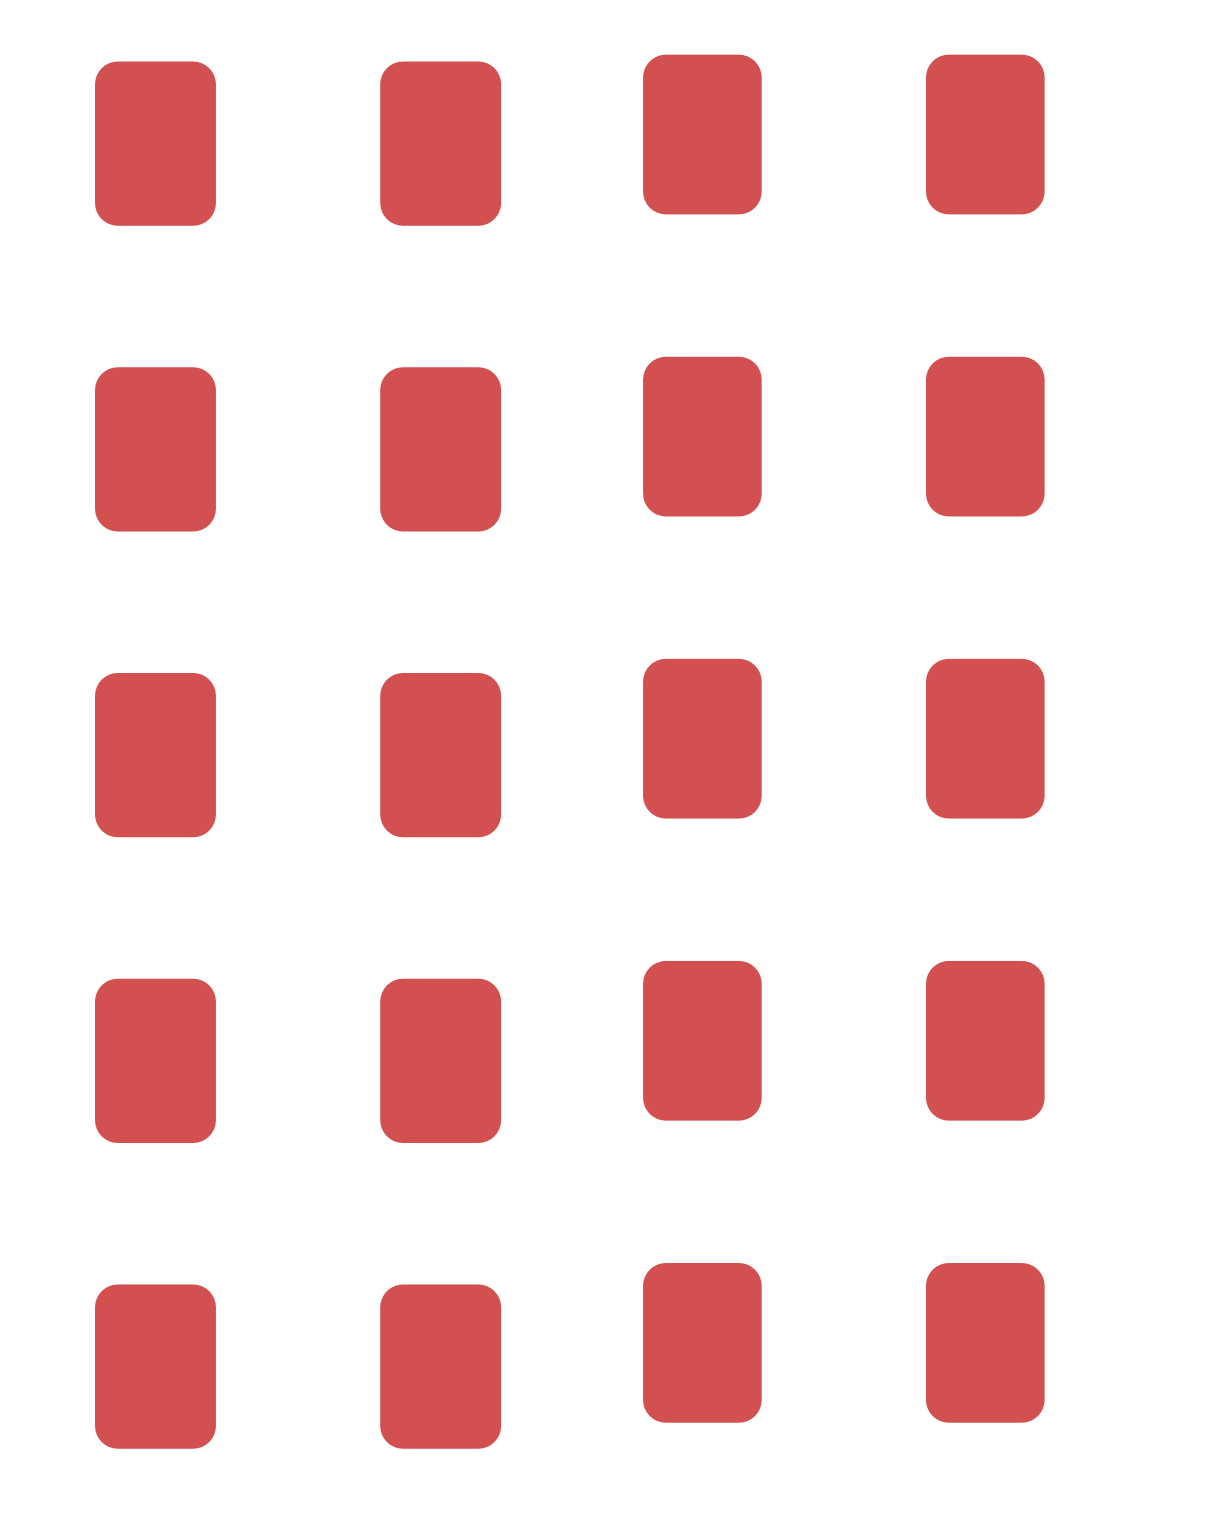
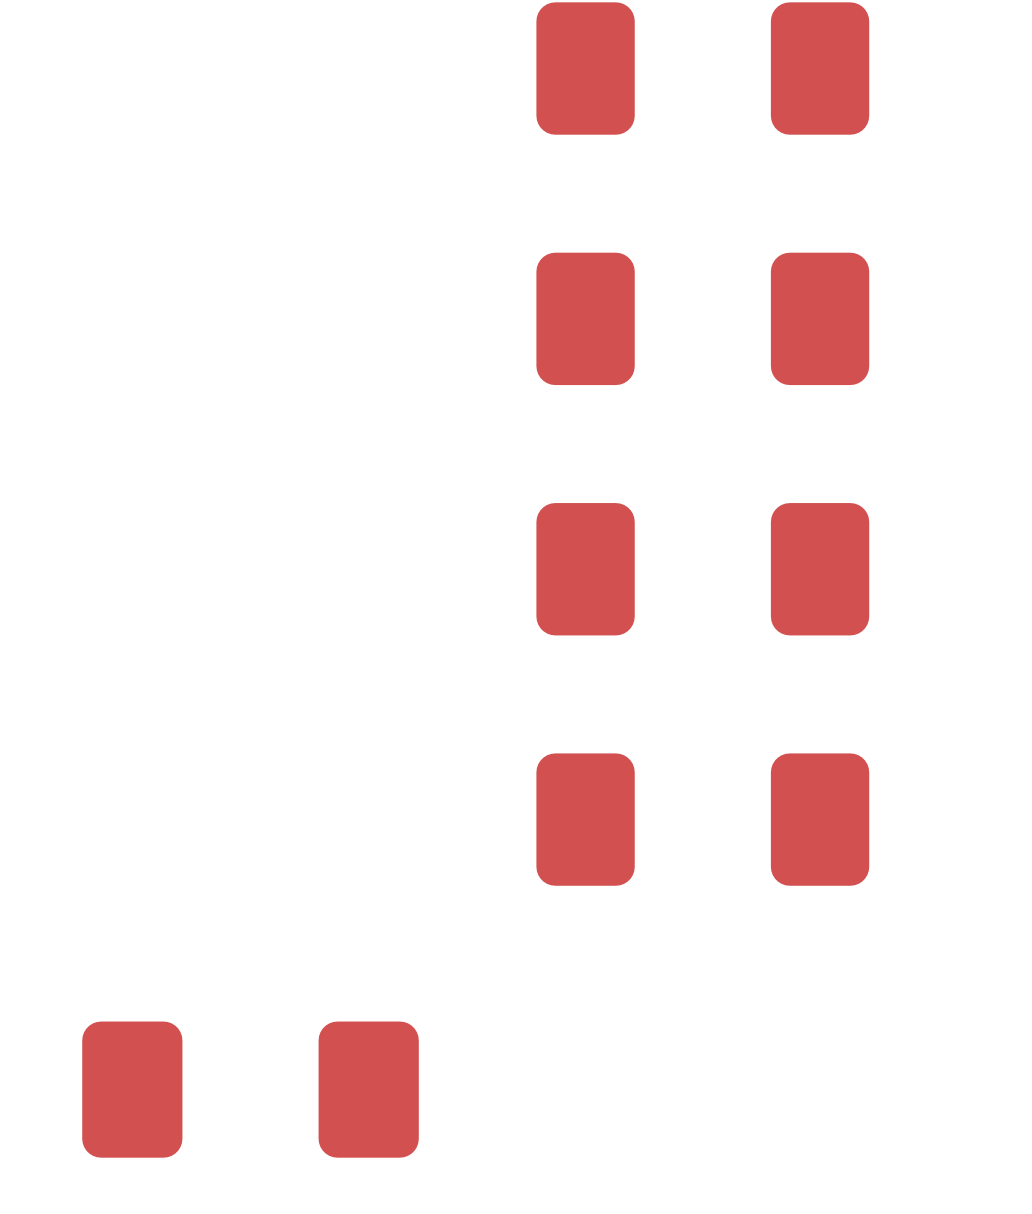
part: (298, 143) -> none
part: (298, 449) -> none
part: (298, 755) -> none
part: (298, 1060) -> none
part: (843, 1342) -> none

